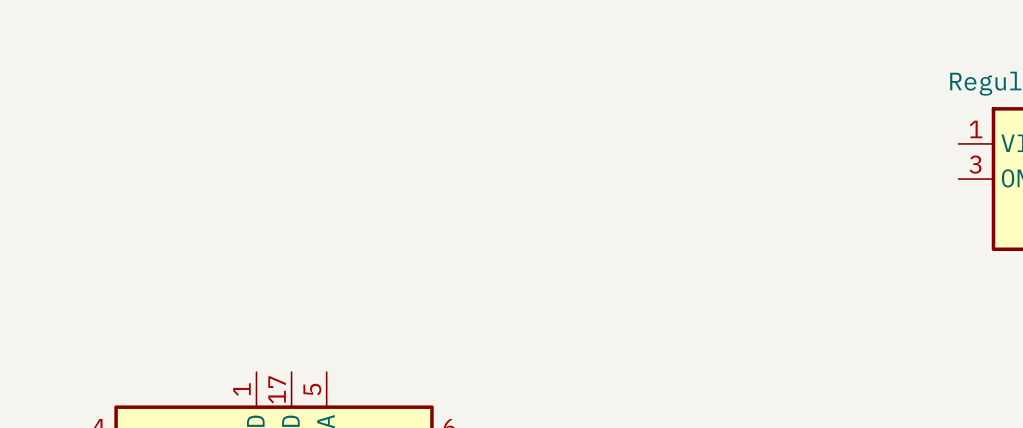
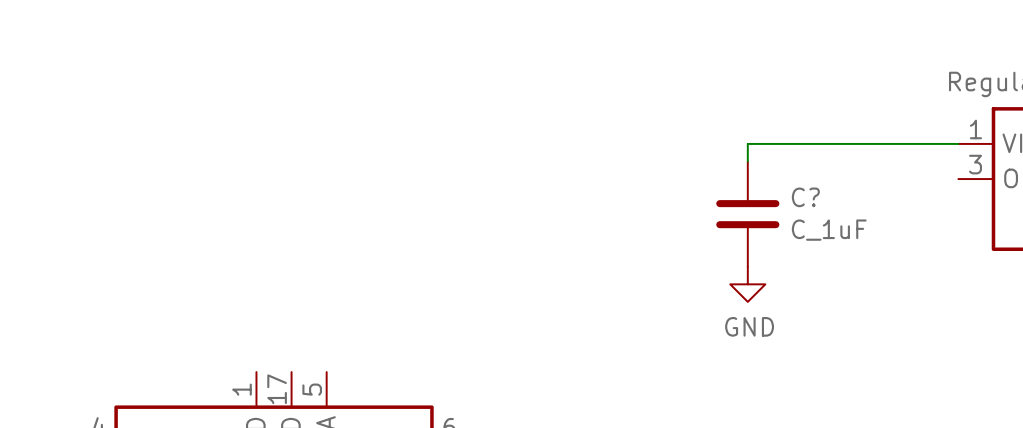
wire: none -> (958, 143) (747, 143) (747, 161)
C?: none -> C_1uF (747, 214)
power symbol: none -> GND (747, 284)

